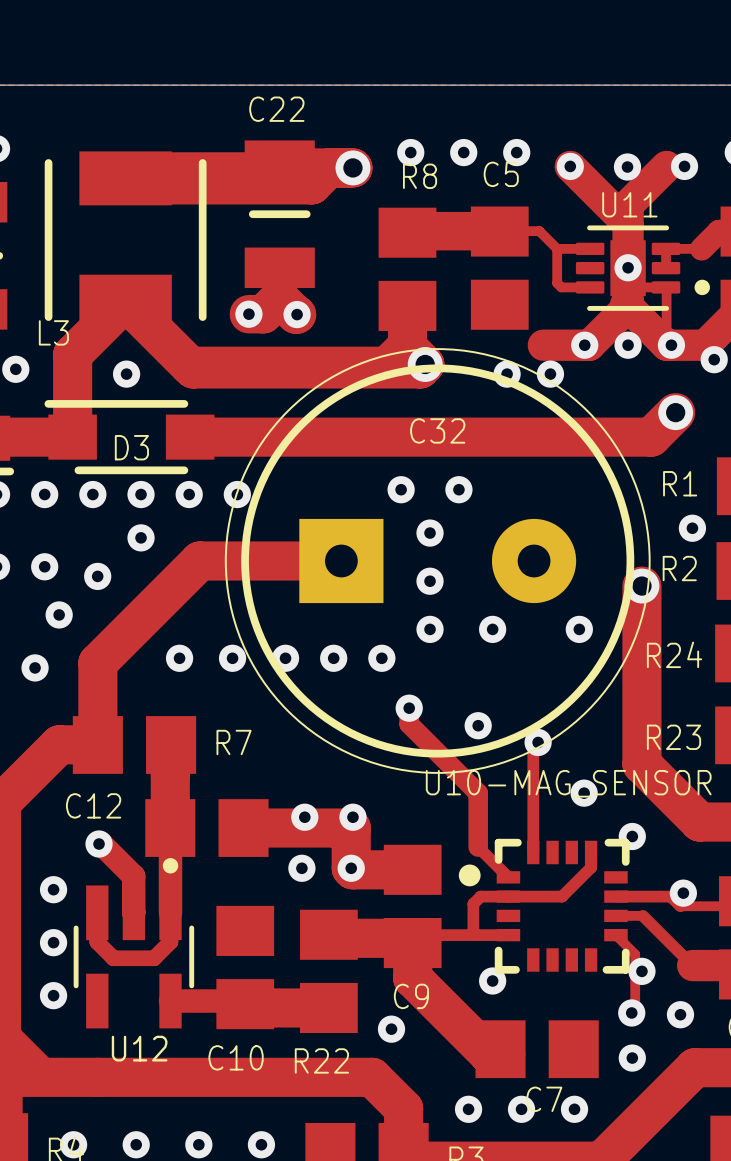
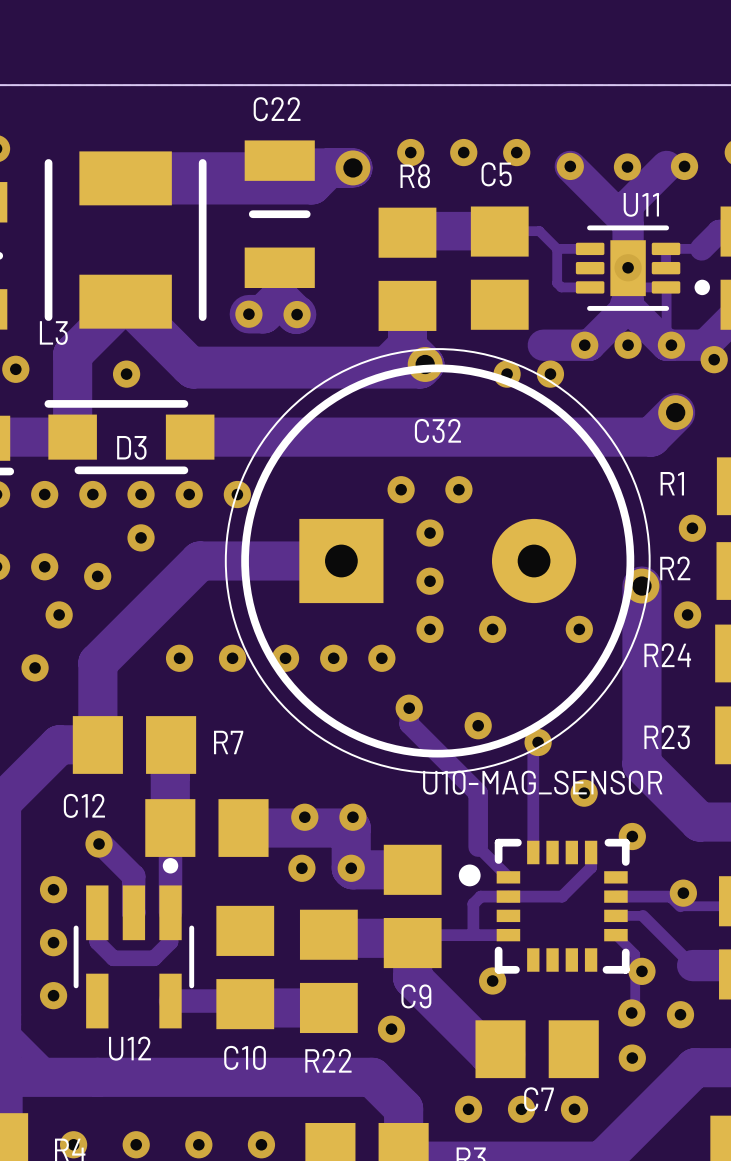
via: none -> (687, 614)

